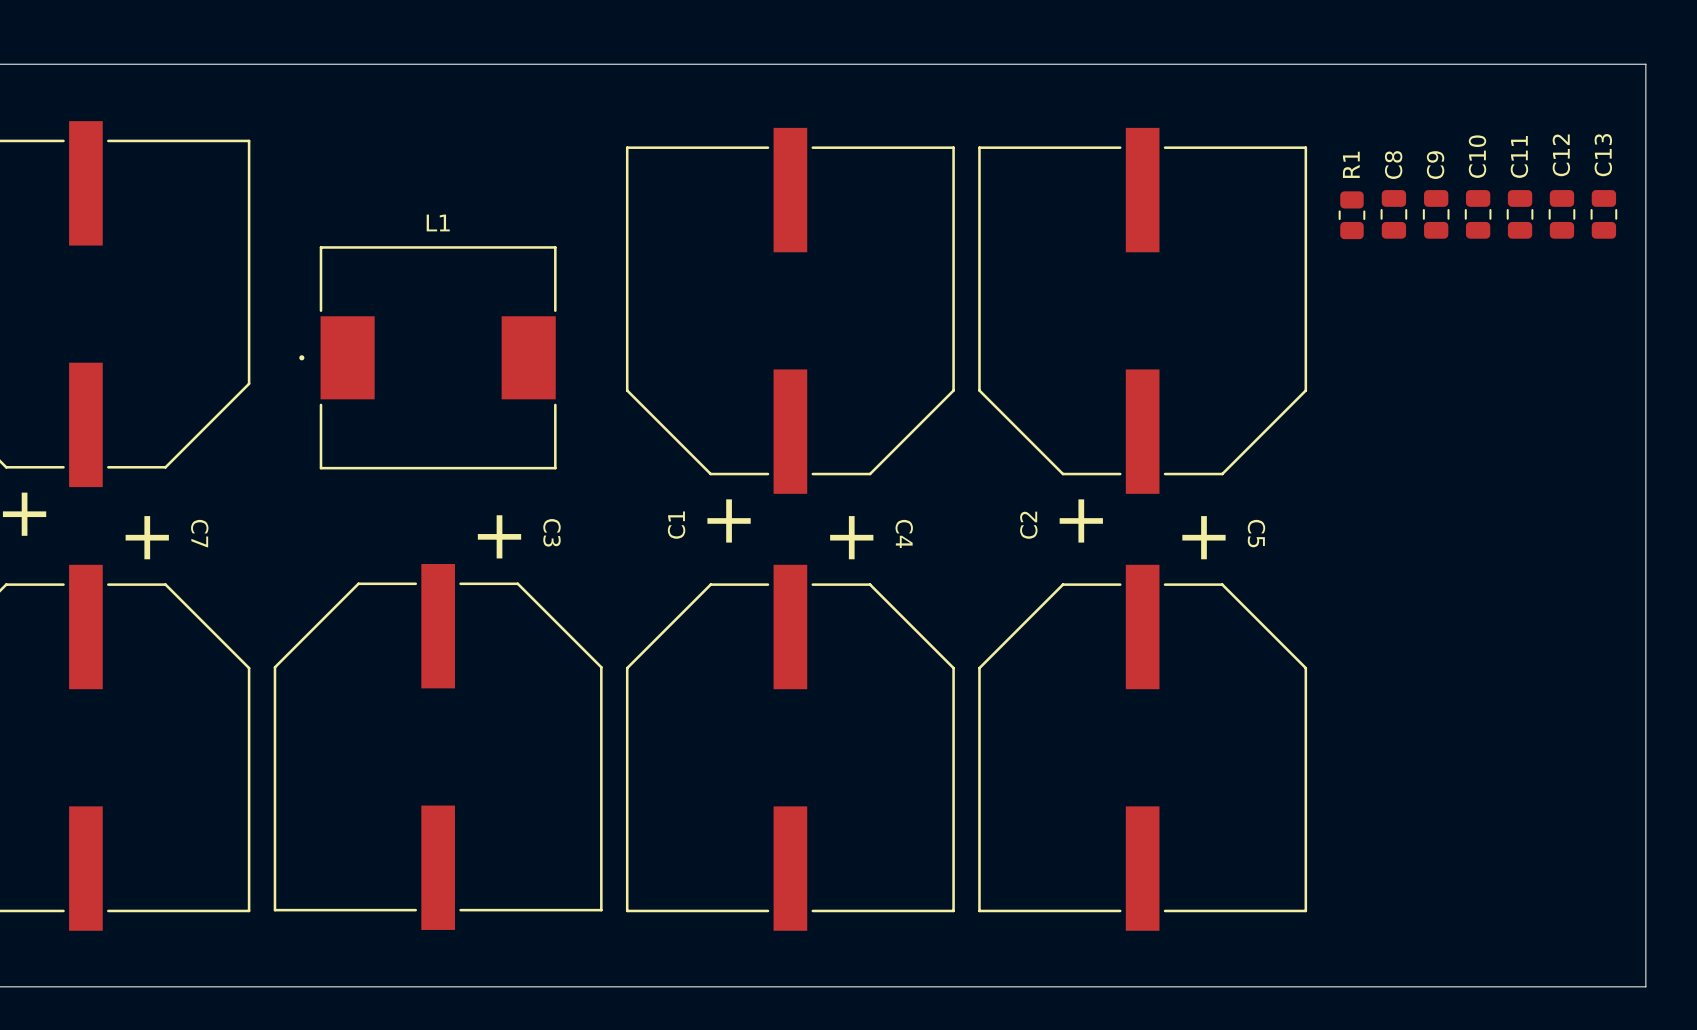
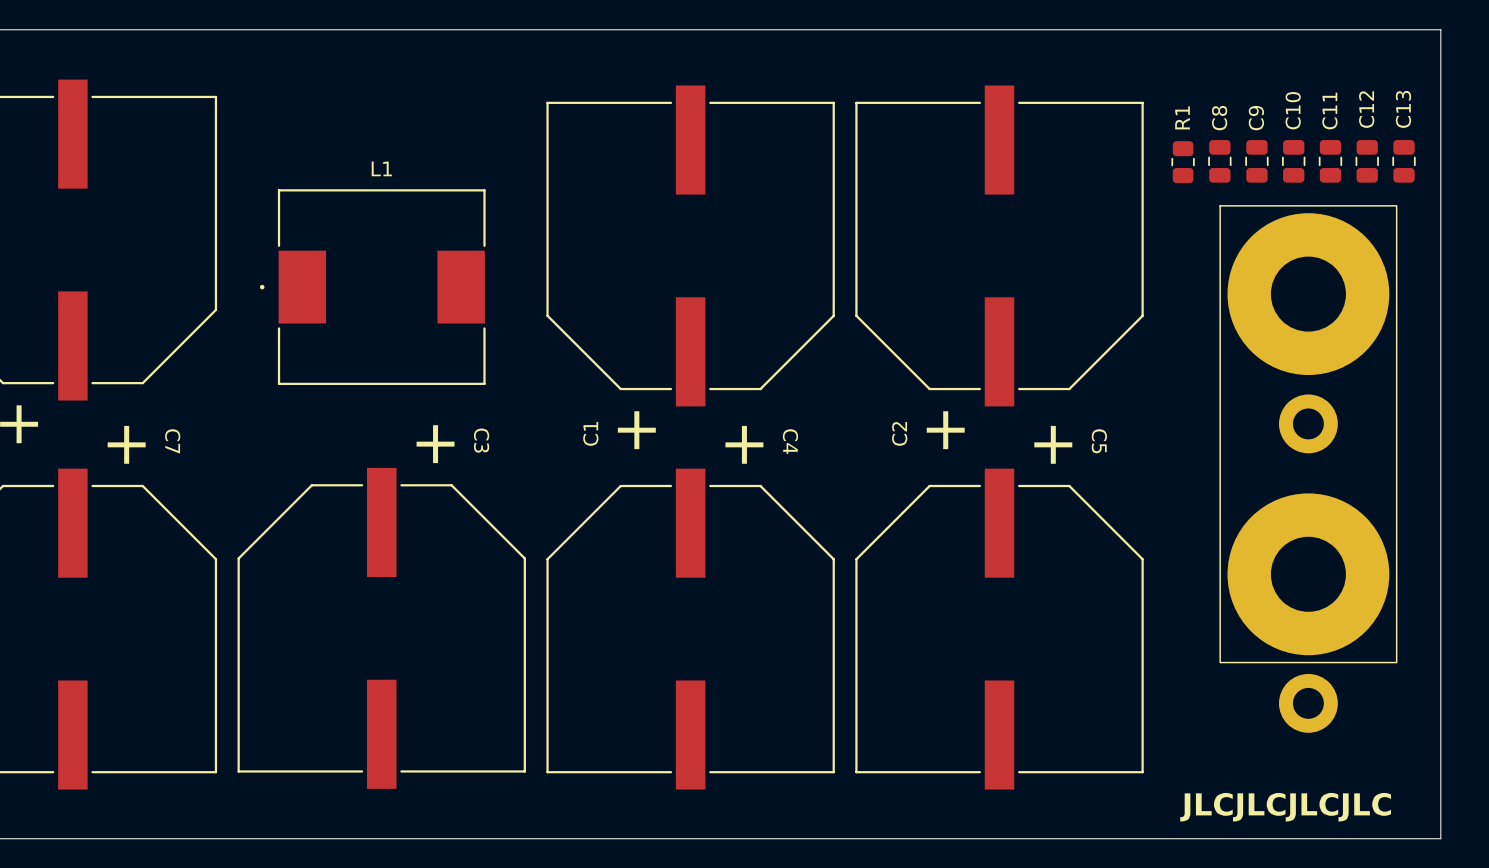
part: none -> (1308, 423)
part: none -> (1308, 434)
part: none -> (1308, 703)
text: none -> JLCJLCJLCJLC (1285, 807)

